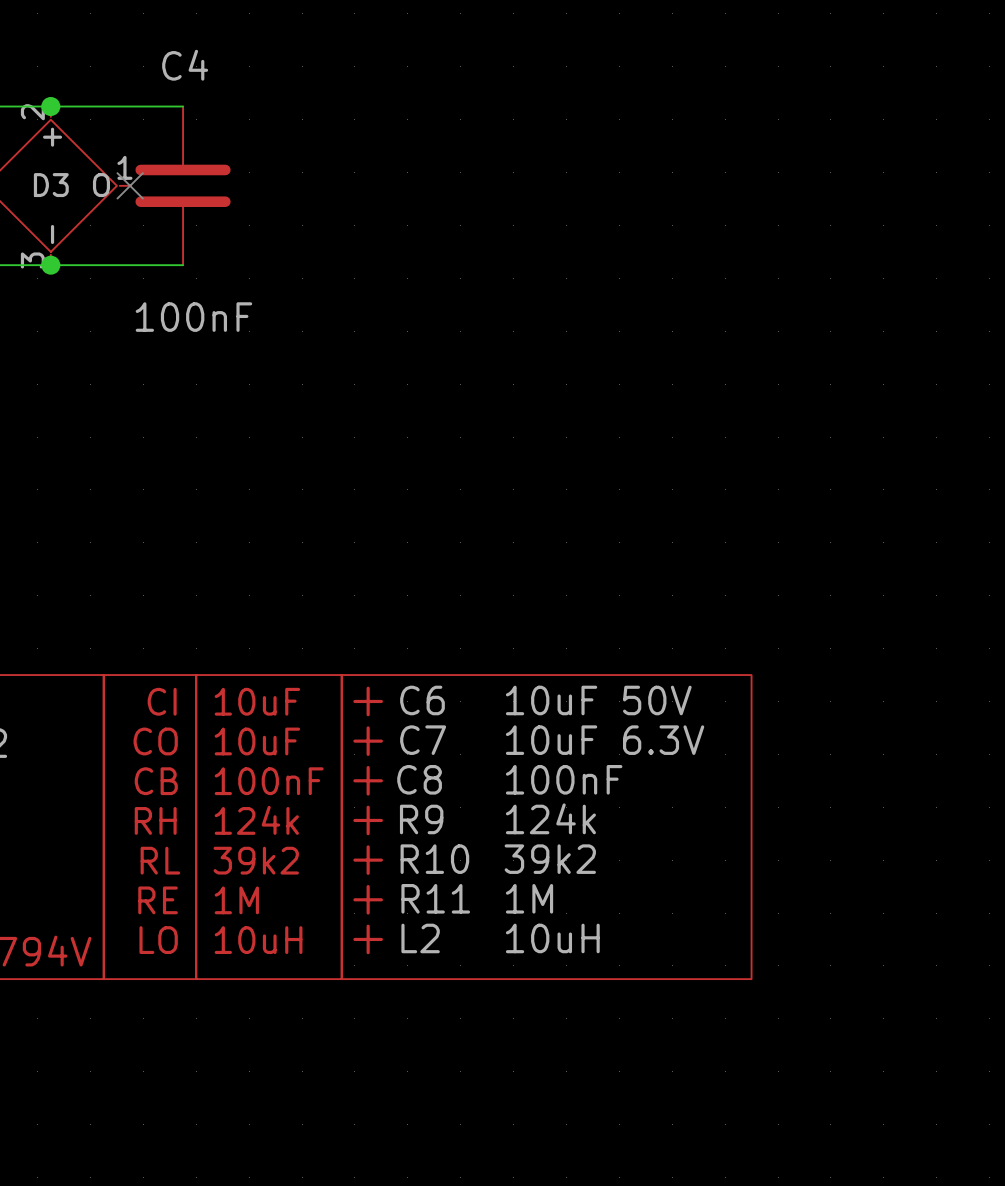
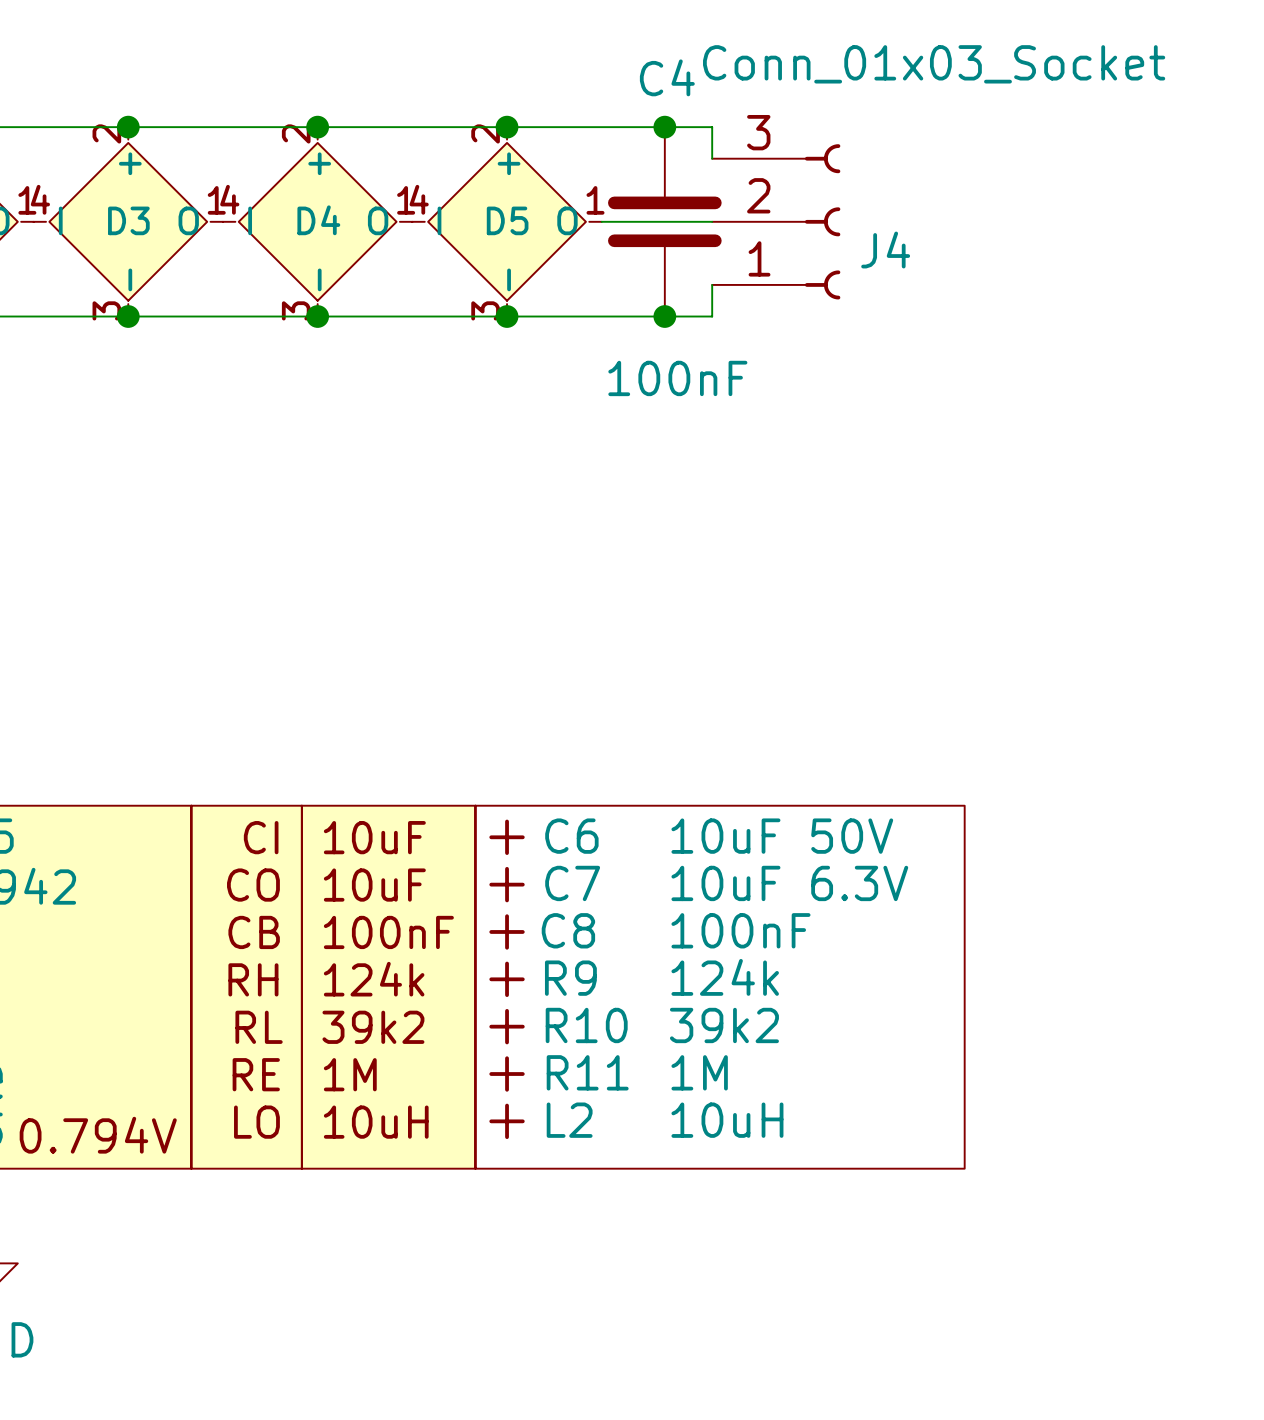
wire: none -> (286, 127) (712, 127) (712, 158)
junction: none -> (317, 127)
junction: none -> (507, 127)
junction: none -> (664, 127)
no-connect mark: (130, 185) -> none
C4 position: (183, 185) -> (664, 221)
D4: none -> (317, 221)
D5: none -> (507, 221)
wire: none -> (601, 221) (712, 221)
J4: none -> Conn_01x03_Socket (776, 221)
wire: none -> (712, 284) (712, 316) (286, 316)
junction: none -> (317, 316)
junction: none -> (507, 316)
junction: none -> (664, 316)

